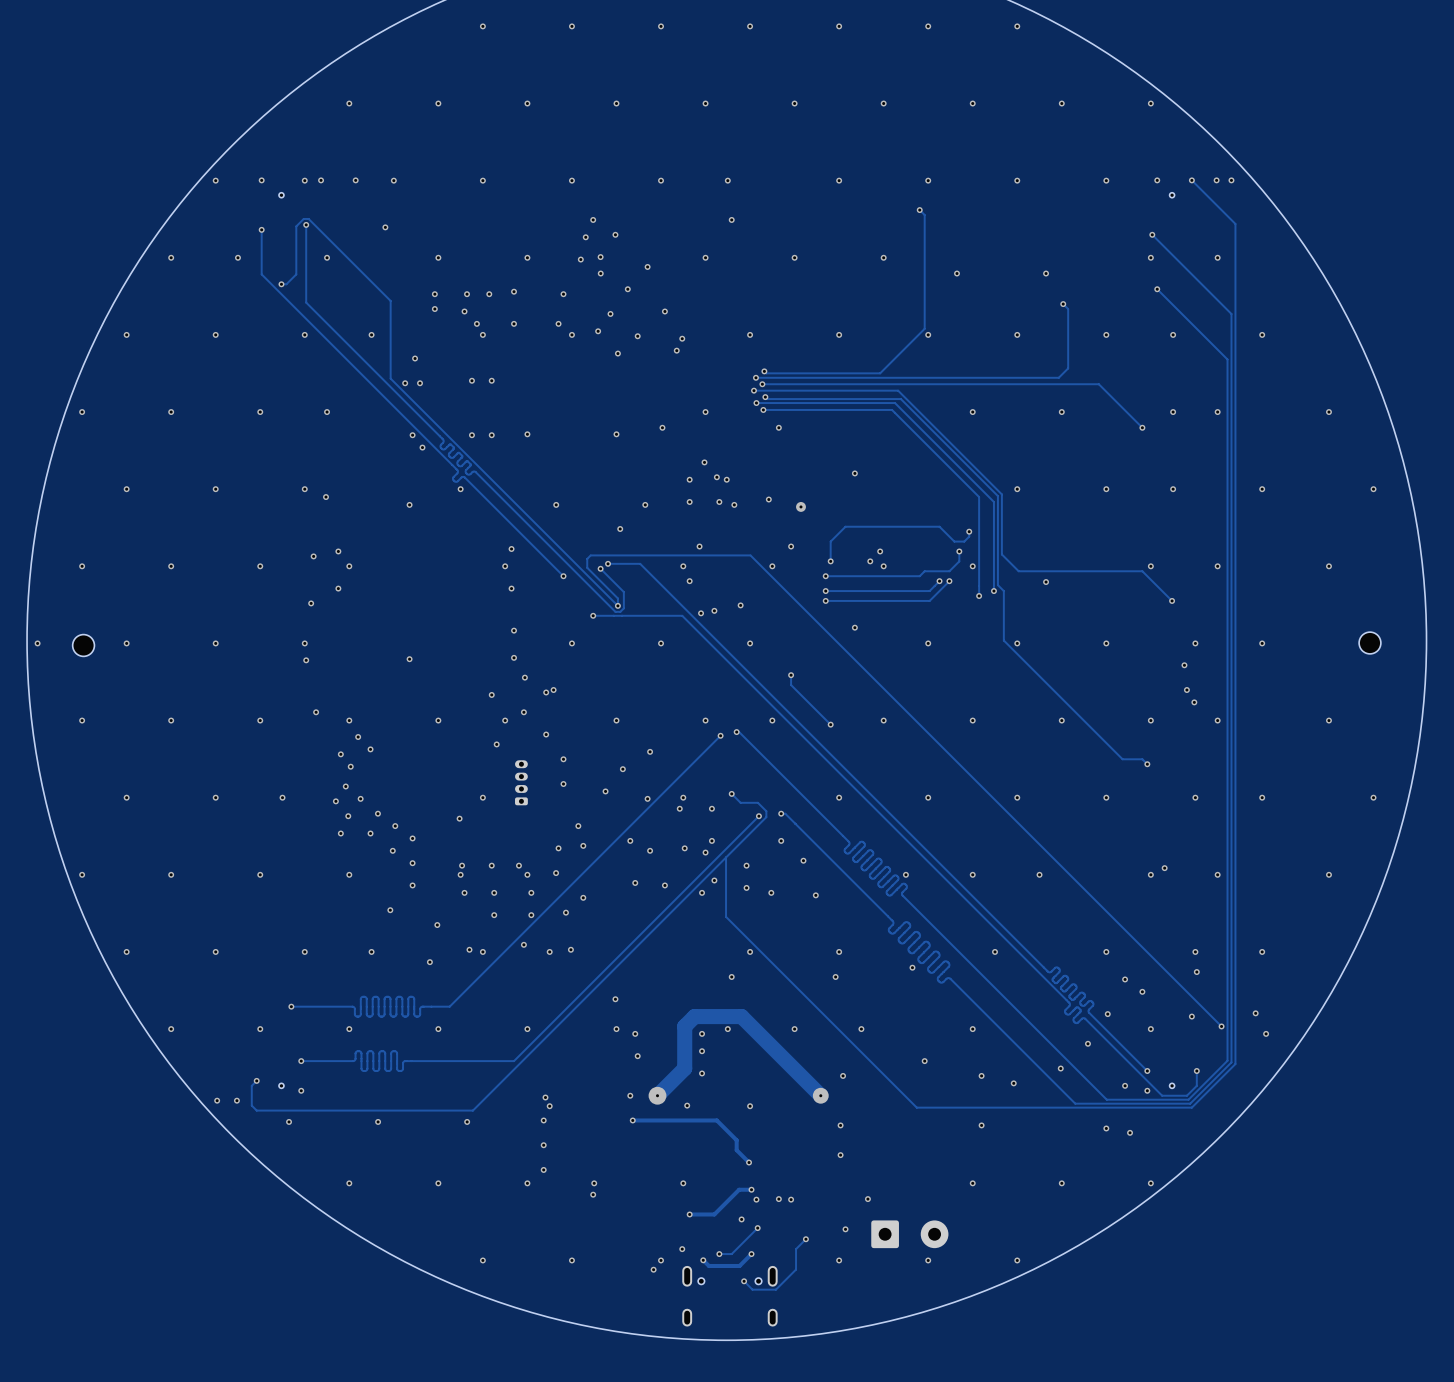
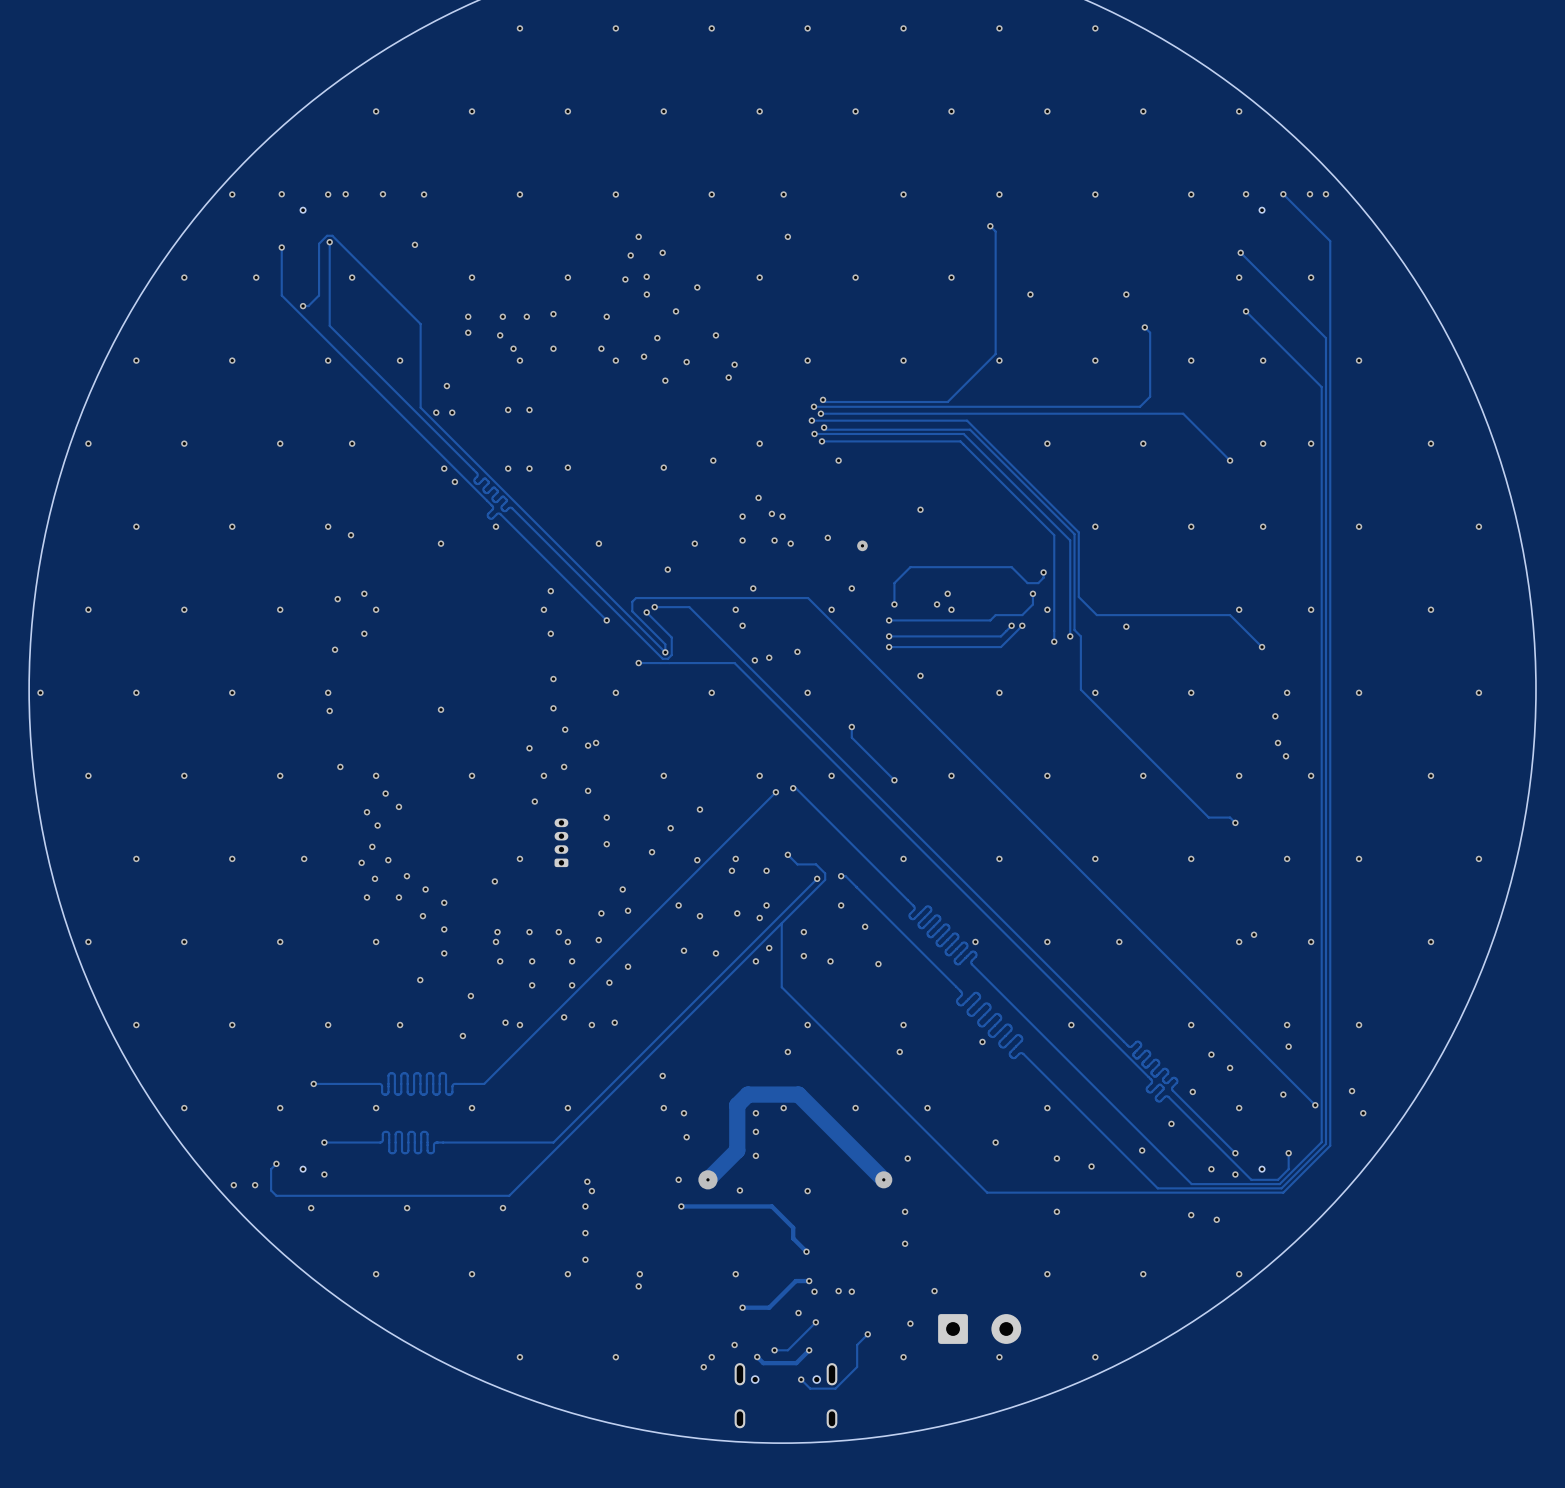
part: (1370, 643) -> none
part: (83, 645) -> none

